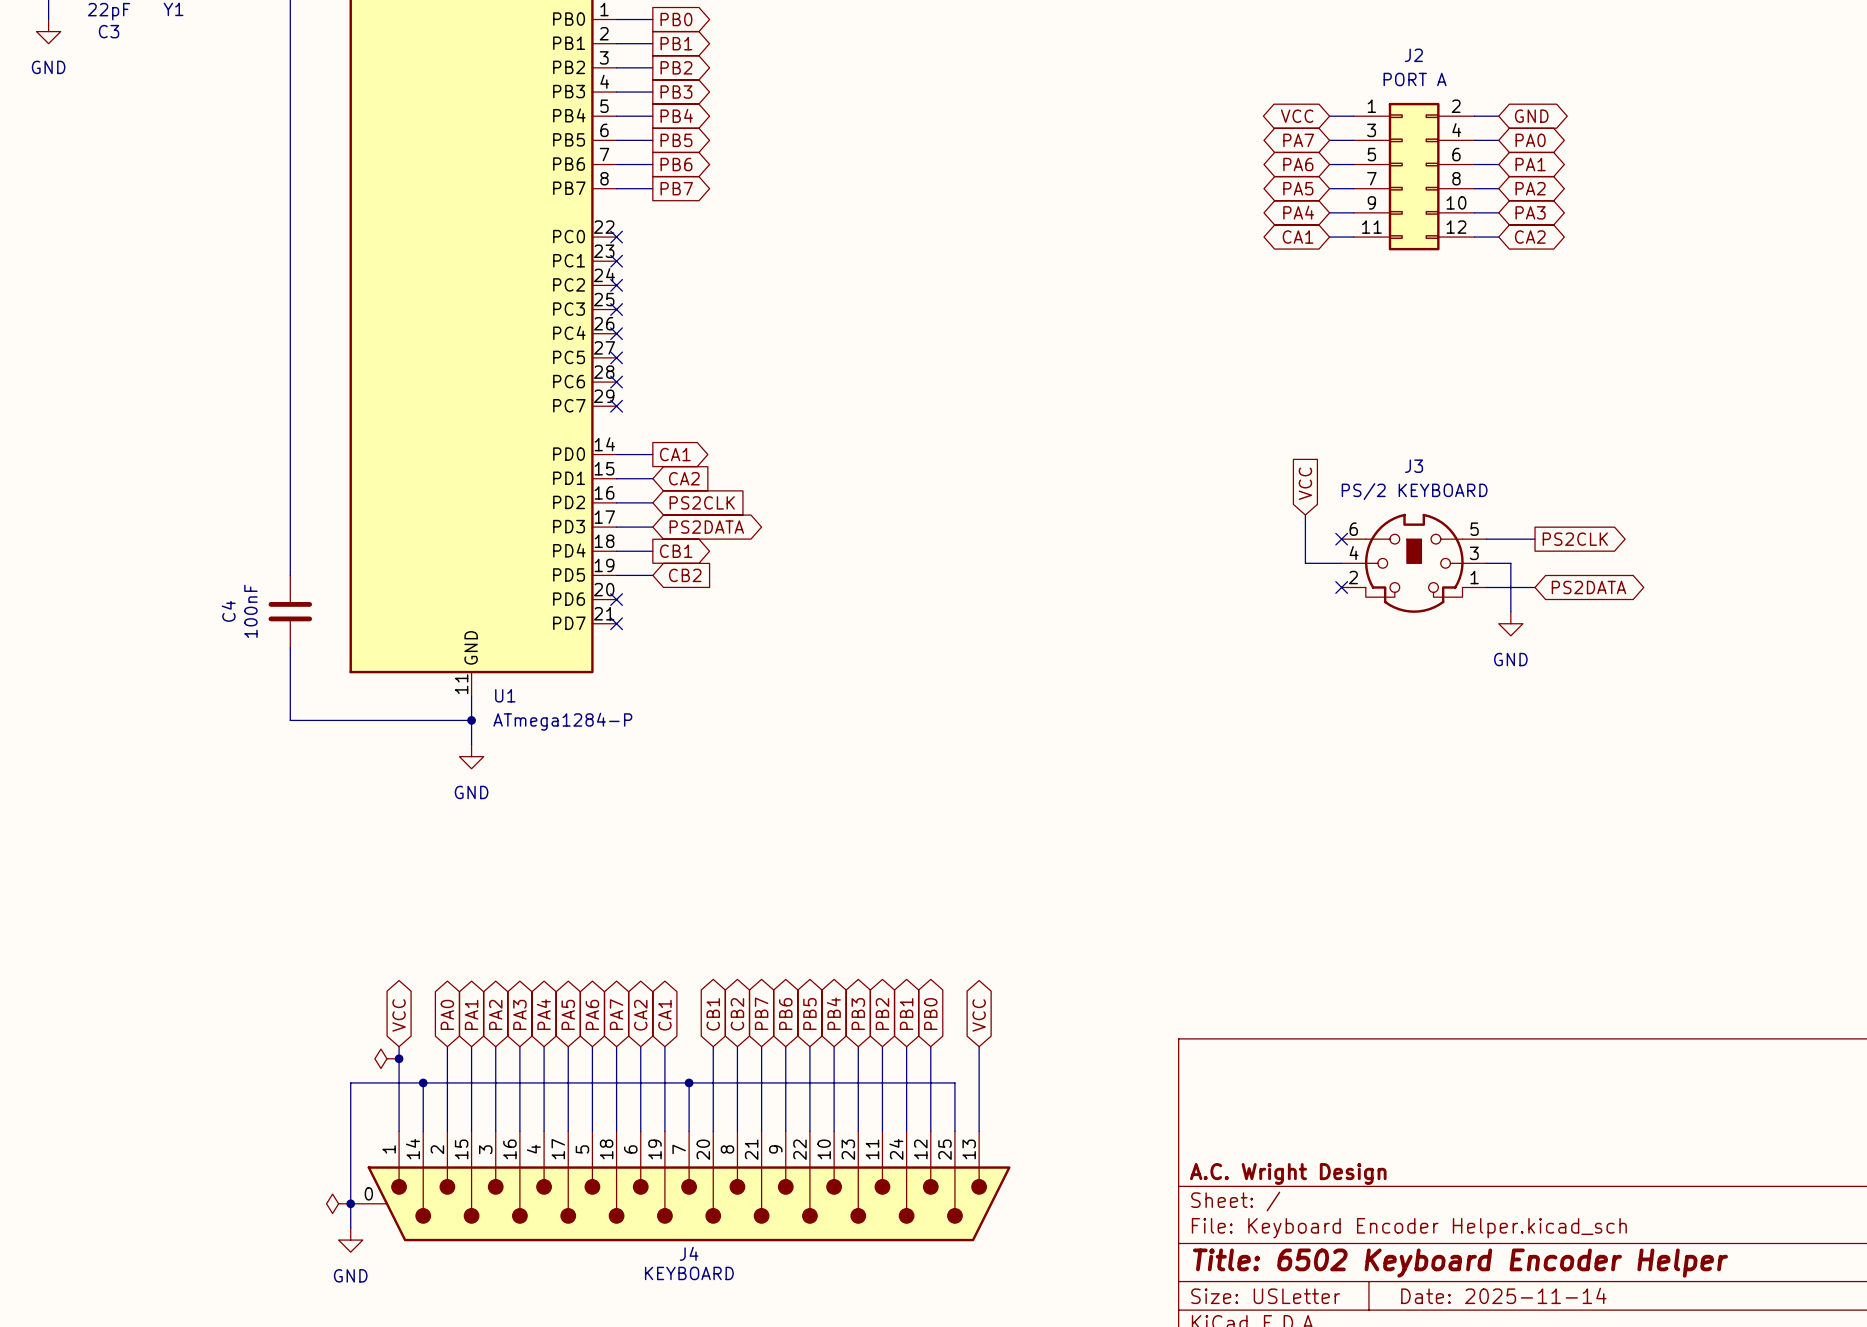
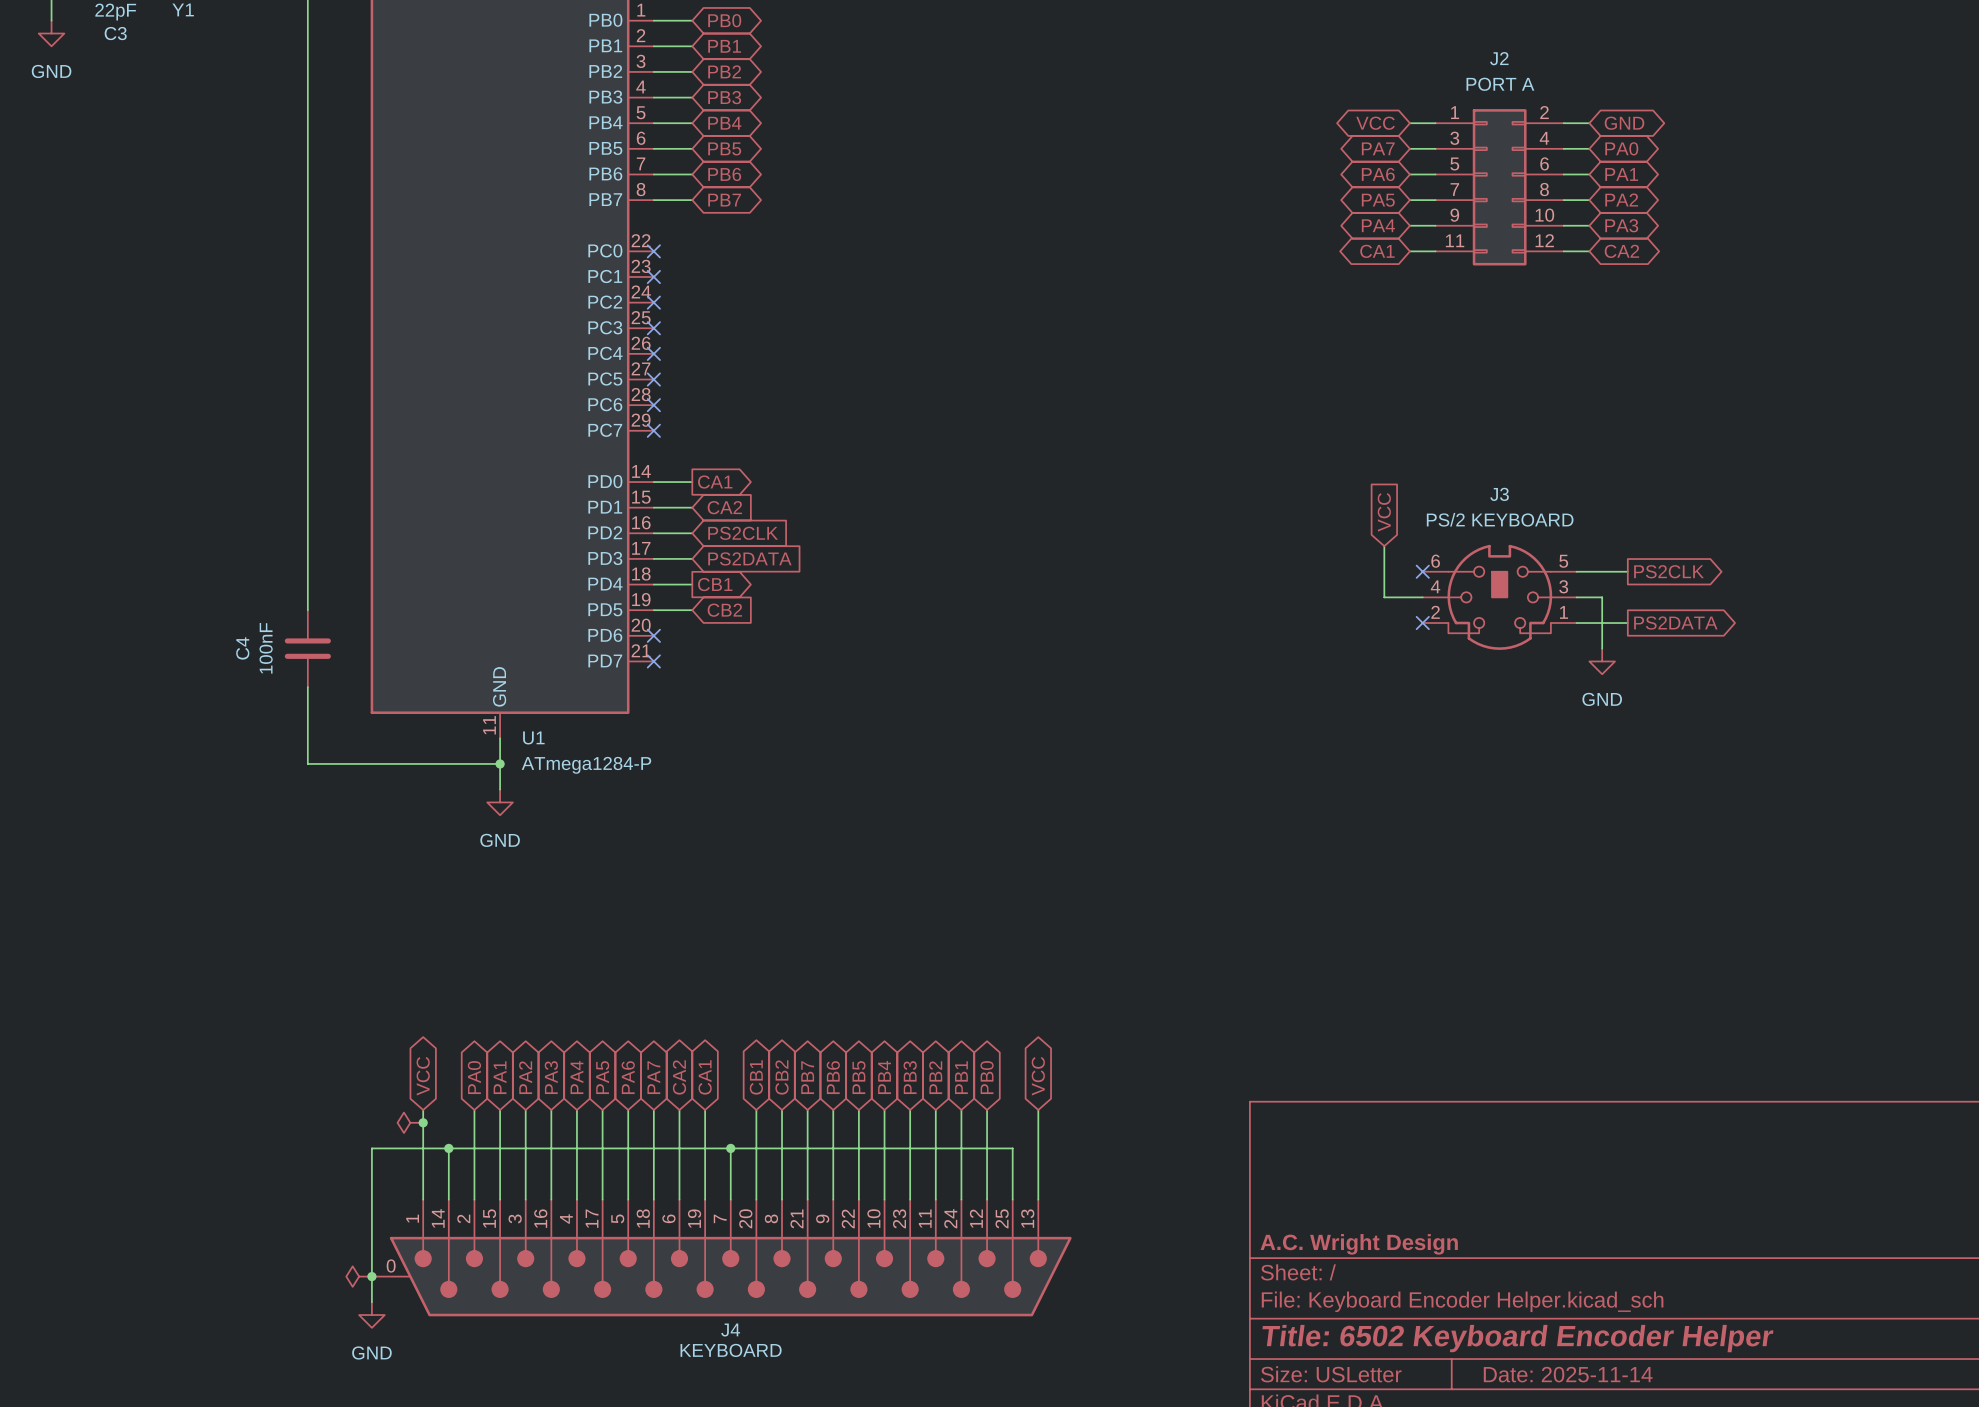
global label shape: output (676, 19) -> bidirectional (724, 20)
global label shape: output (676, 43) -> bidirectional (724, 46)
global label shape: output (676, 67) -> bidirectional (724, 71)
global label shape: output (676, 92) -> bidirectional (724, 97)
global label shape: output (676, 115) -> bidirectional (724, 123)
global label shape: output (676, 140) -> bidirectional (724, 148)
global label shape: output (676, 164) -> bidirectional (724, 174)
global label shape: output (676, 188) -> bidirectional (724, 200)
global label shape: bidirectional (706, 527) -> input (749, 558)
global label shape: bidirectional (1588, 587) -> output (1675, 623)

